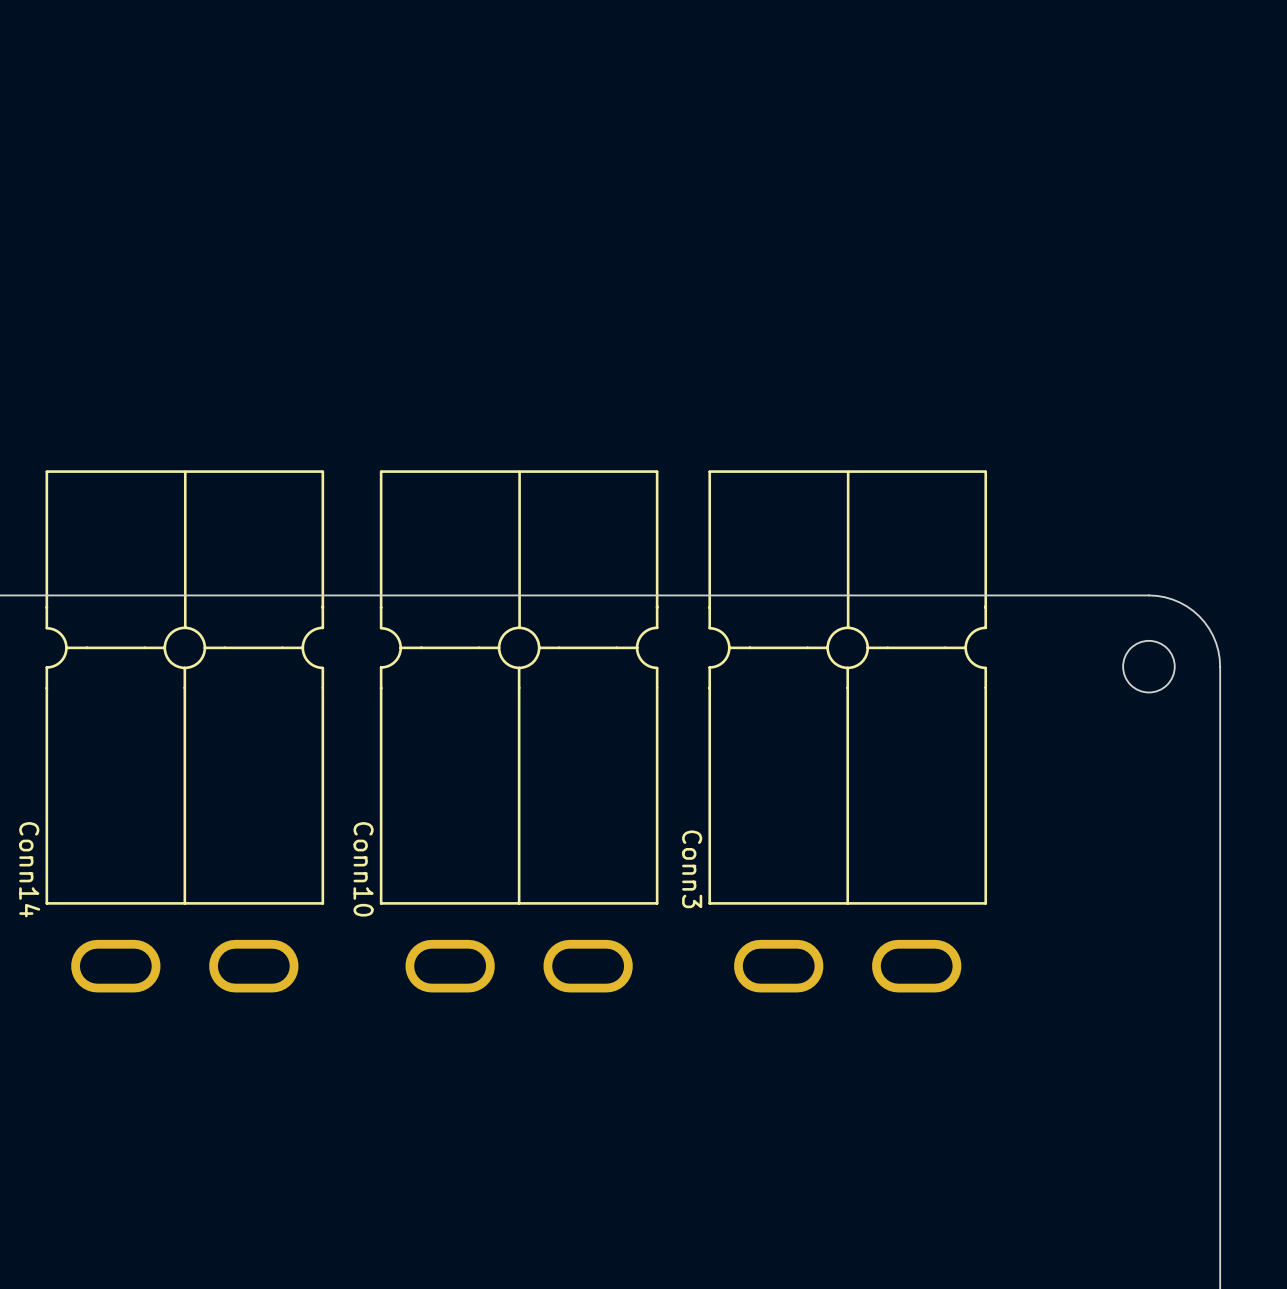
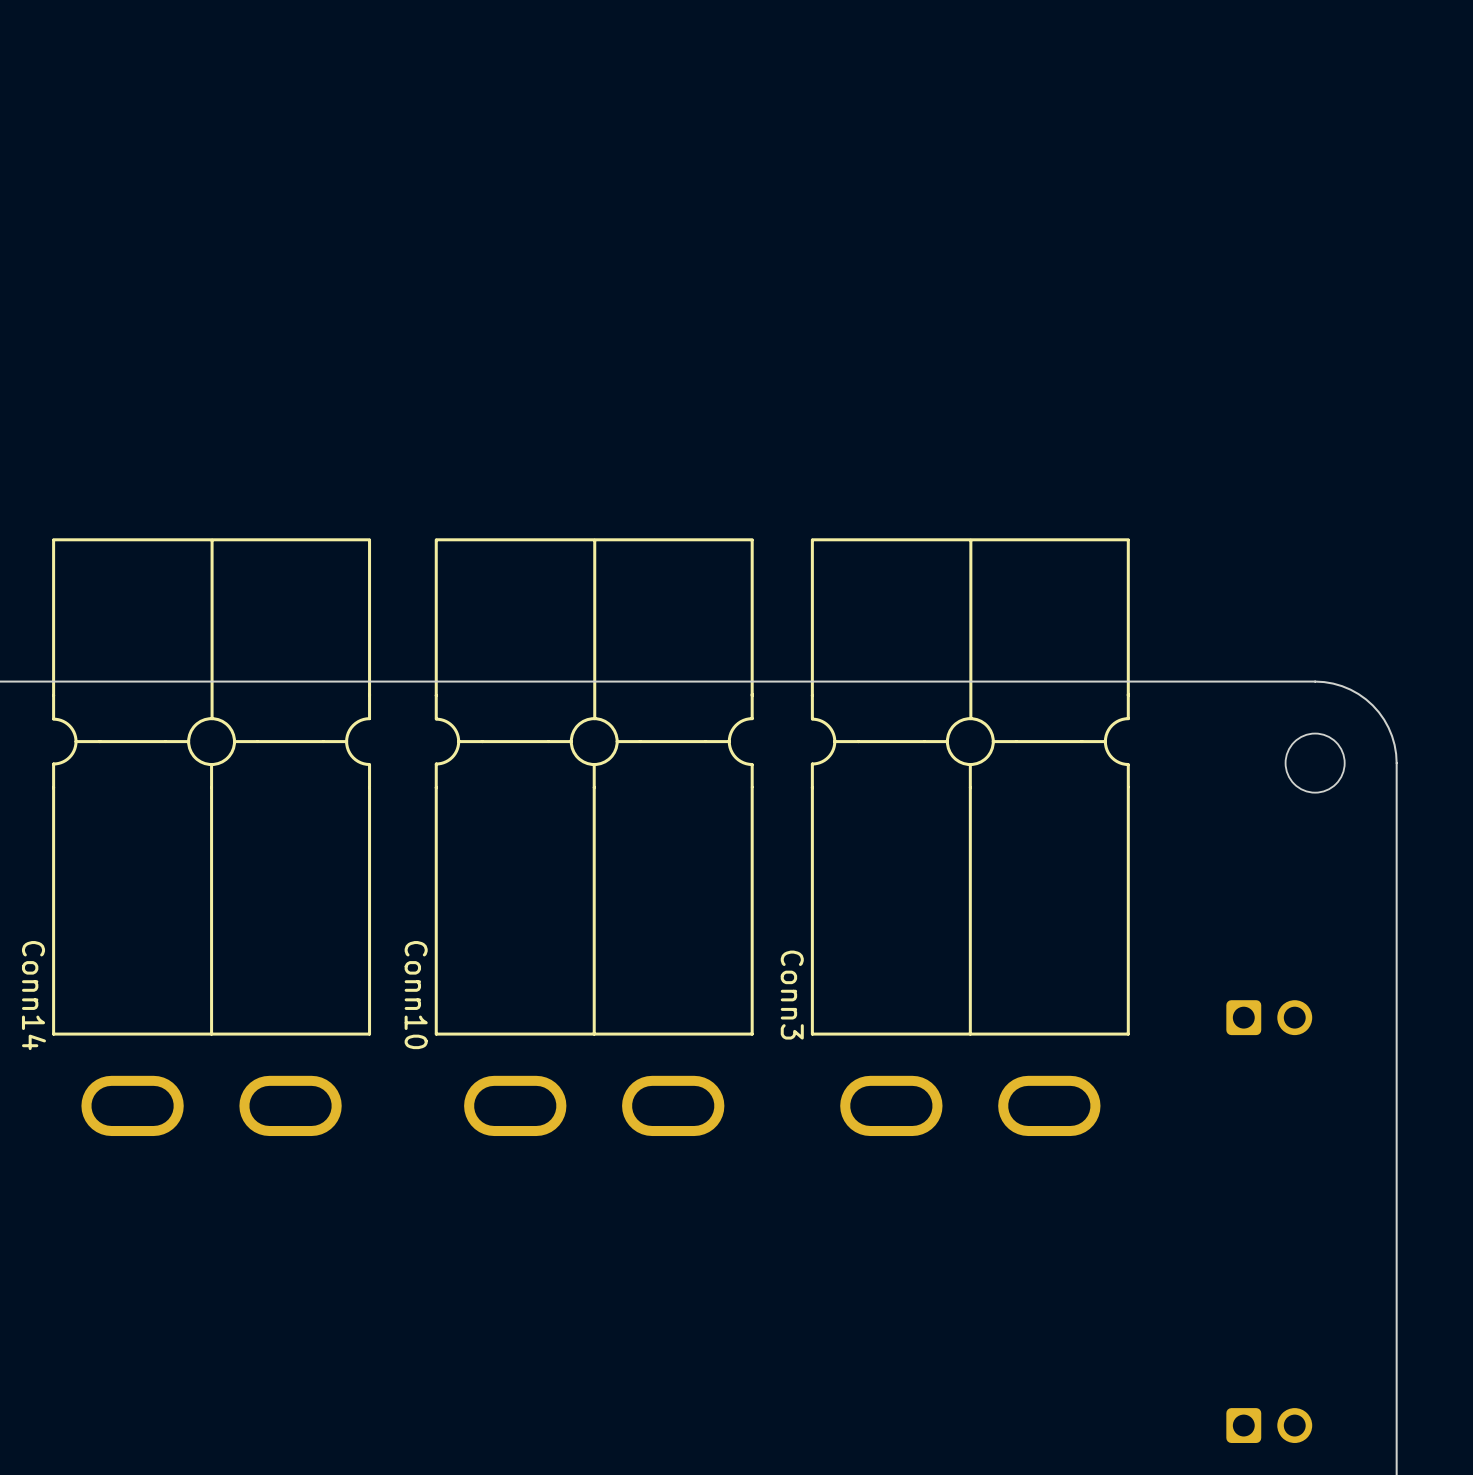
part: none -> (1269, 1017)
part: none -> (1269, 1425)

